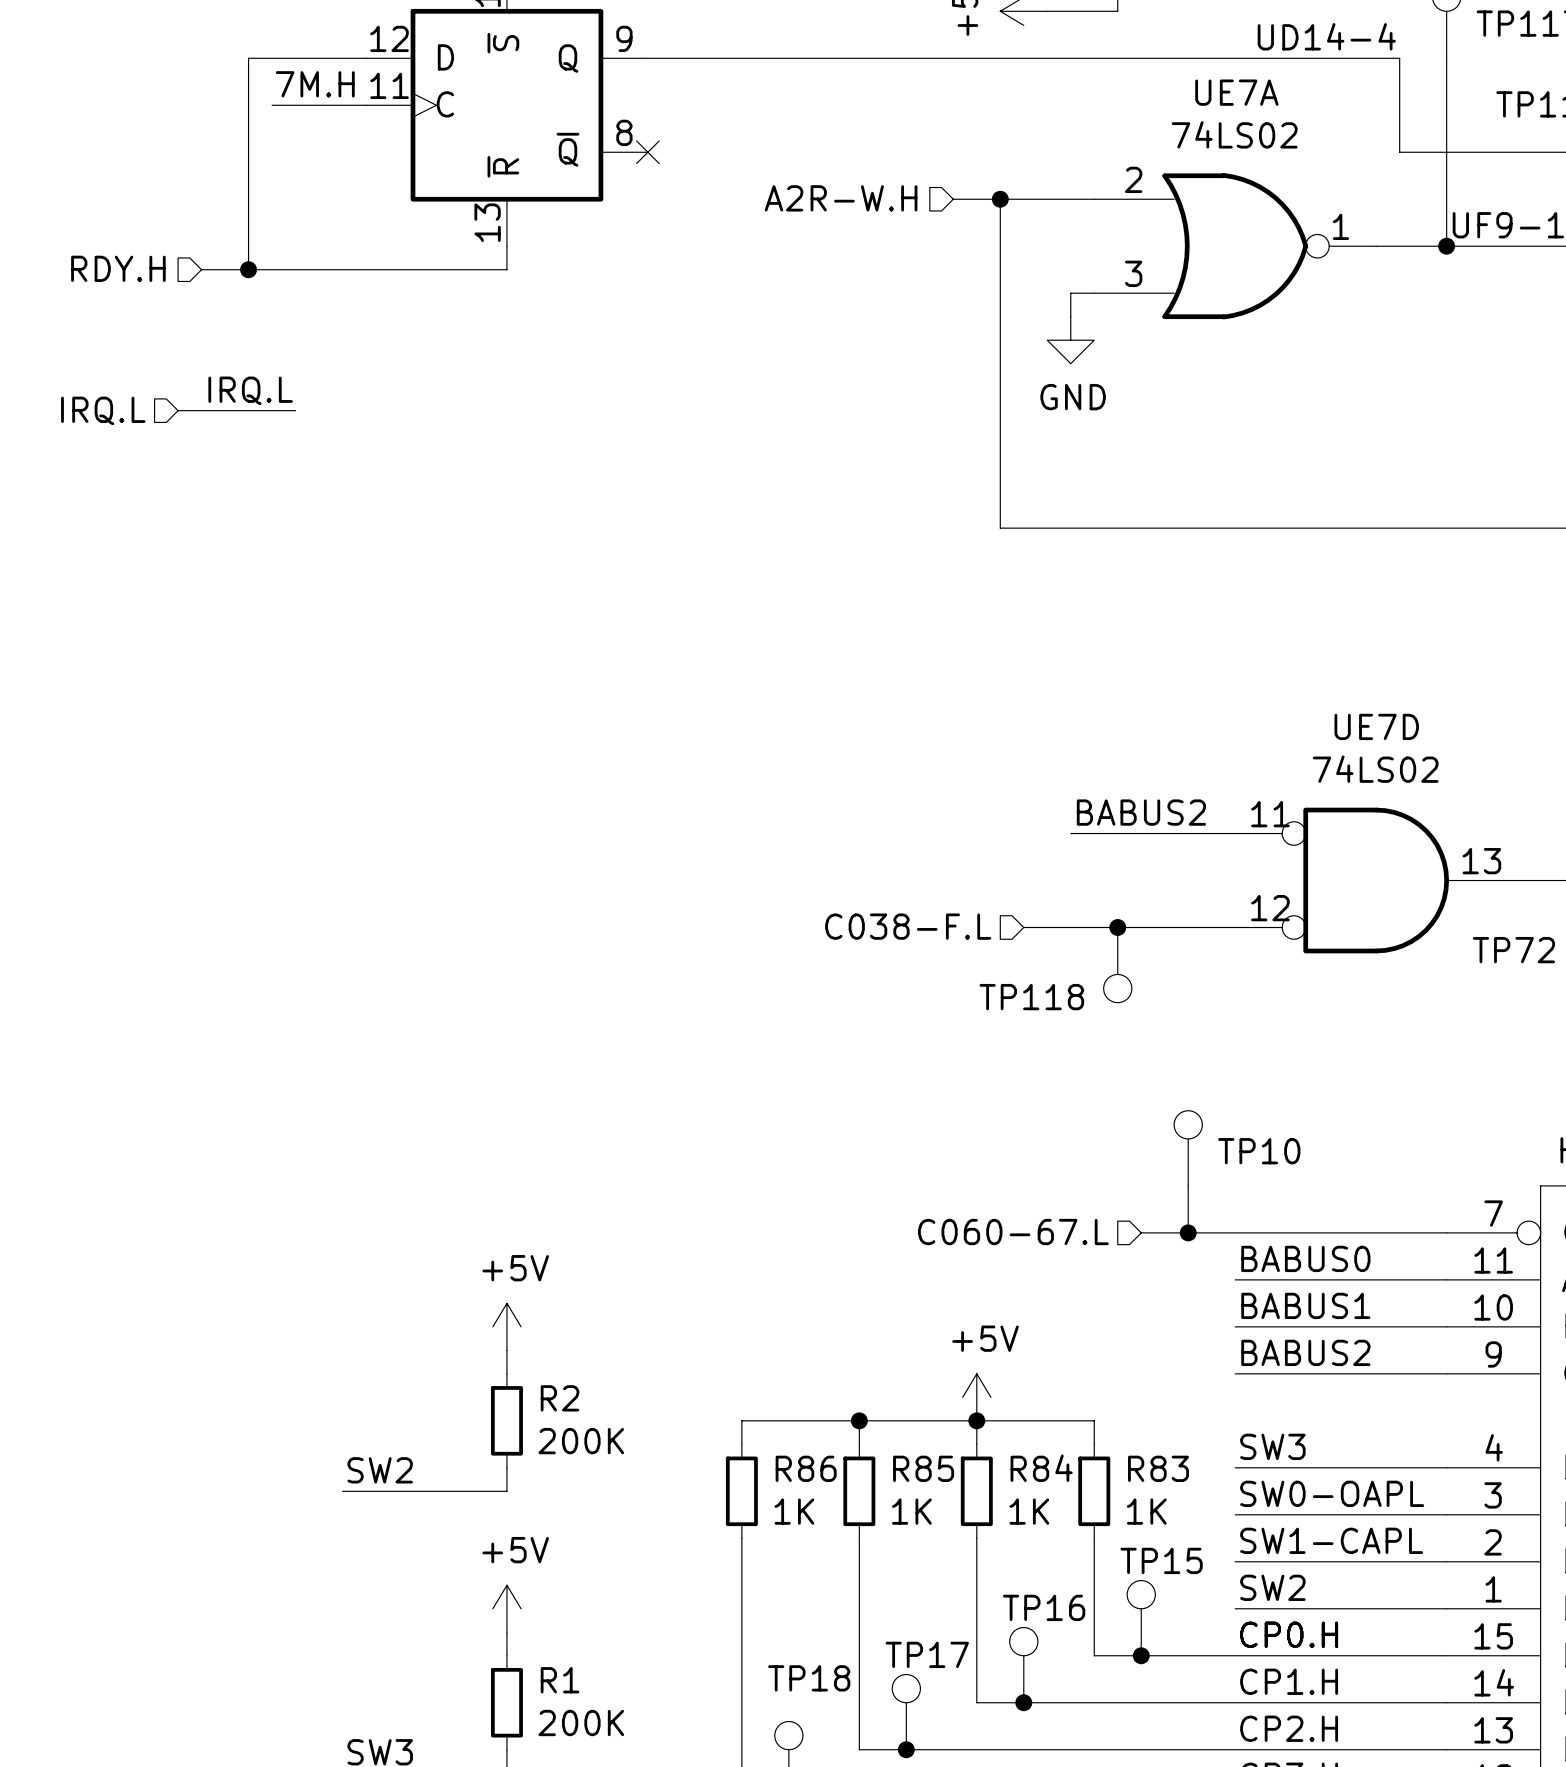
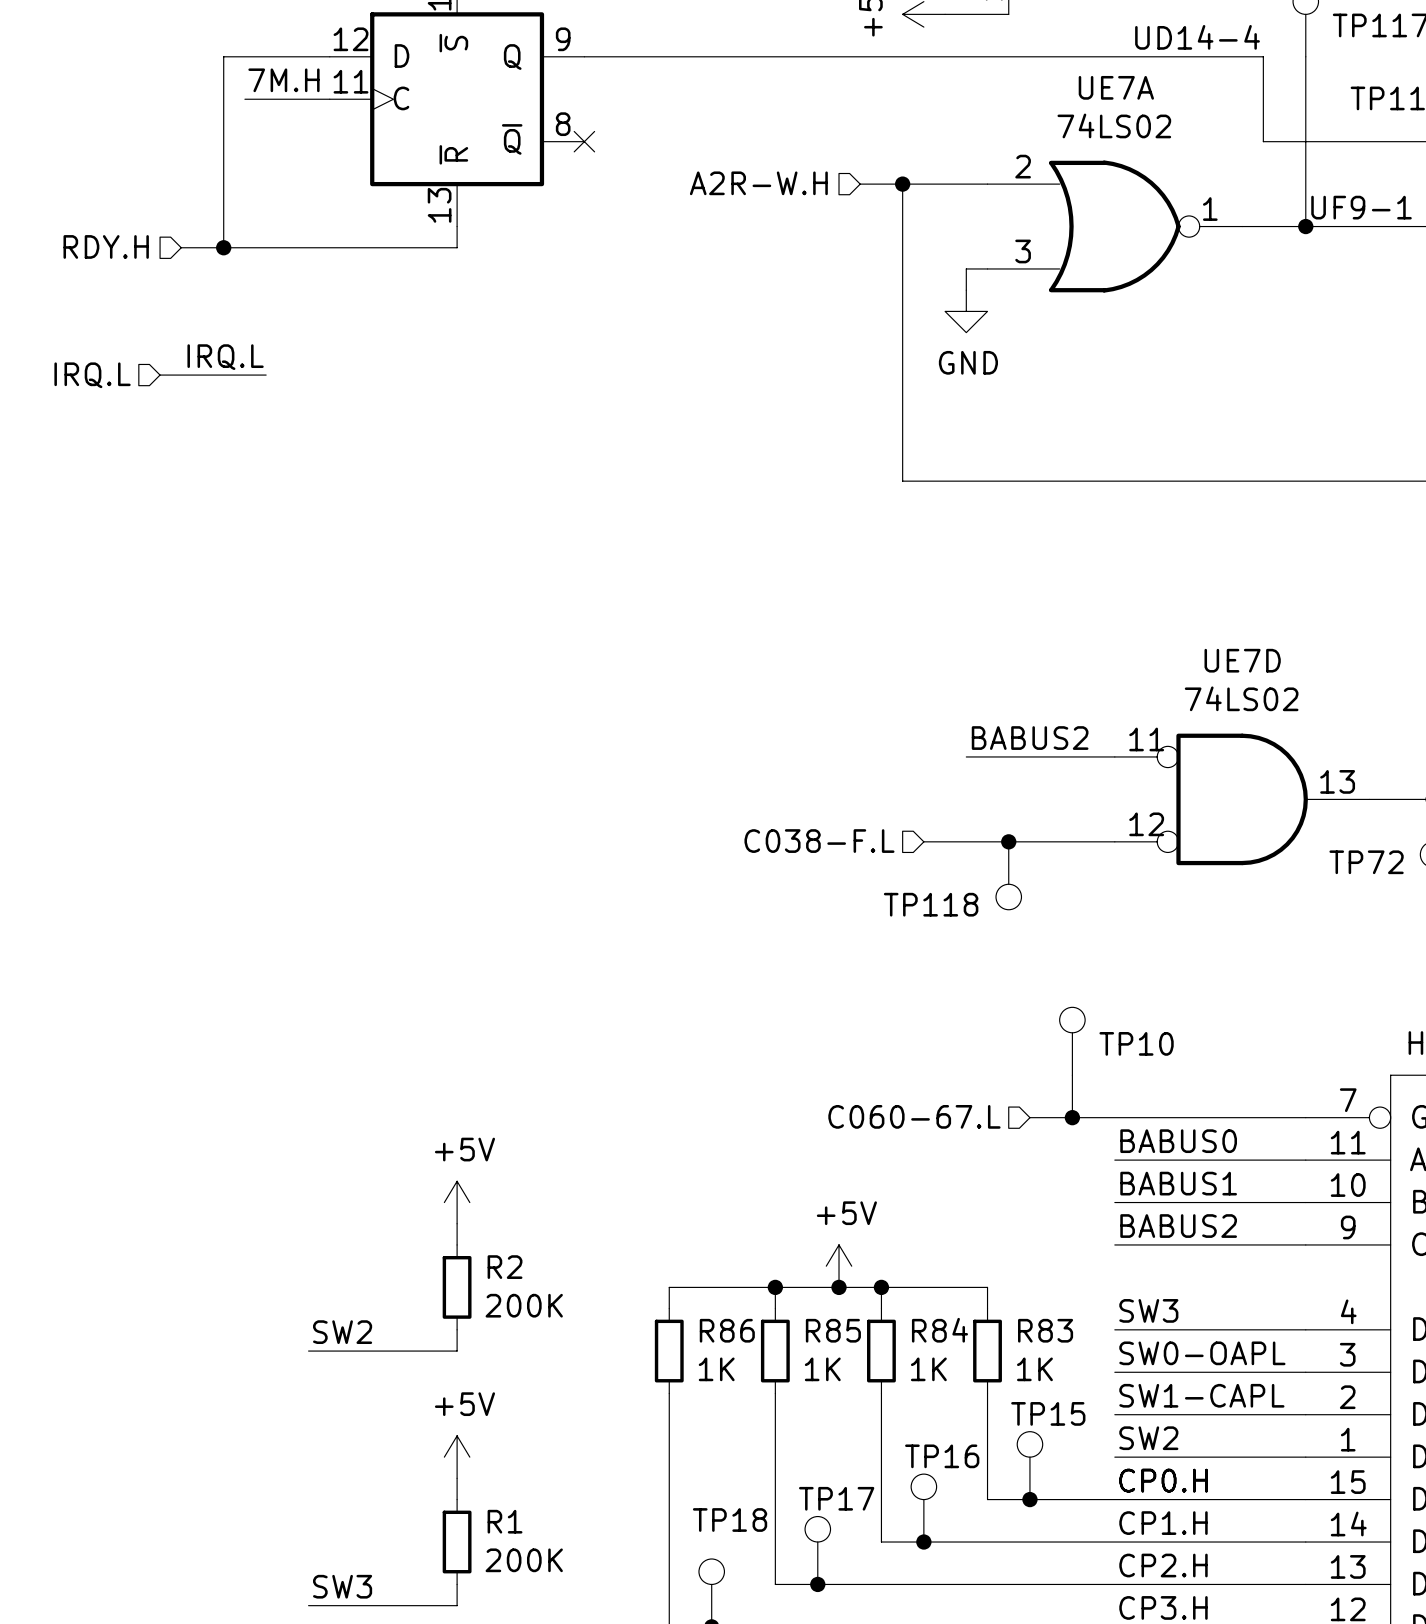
power symbol position: +5V (976, 1397) -> +5V (839, 1266)
junction: none -> (839, 1287)

